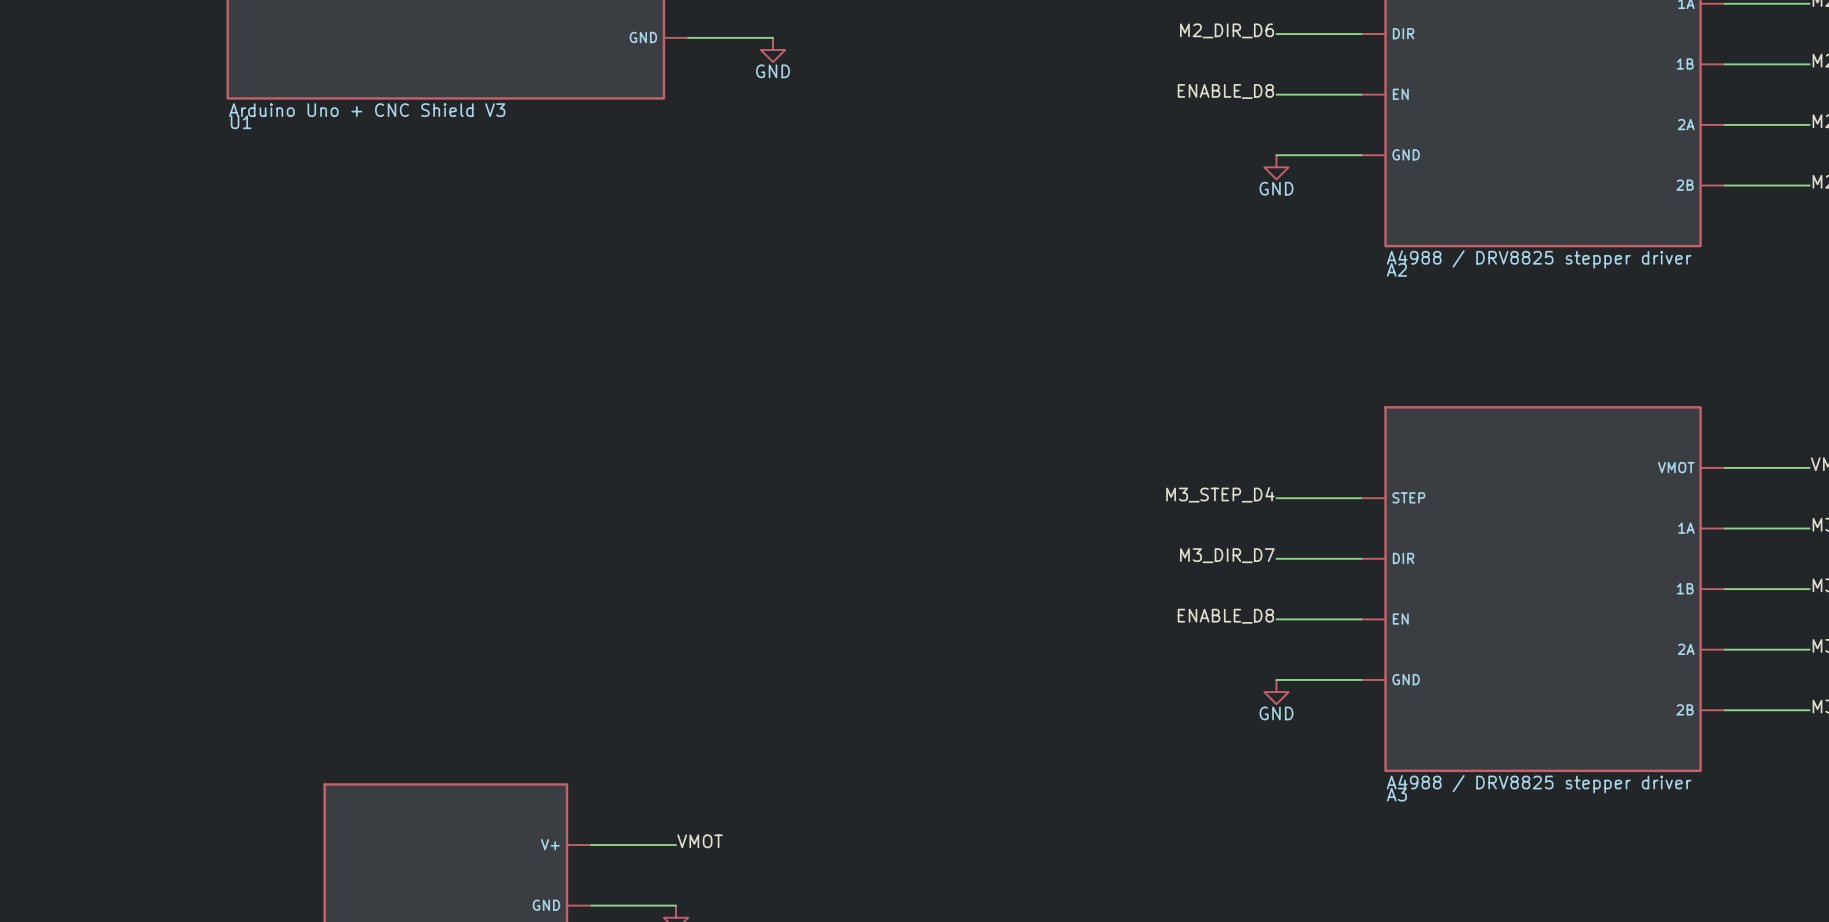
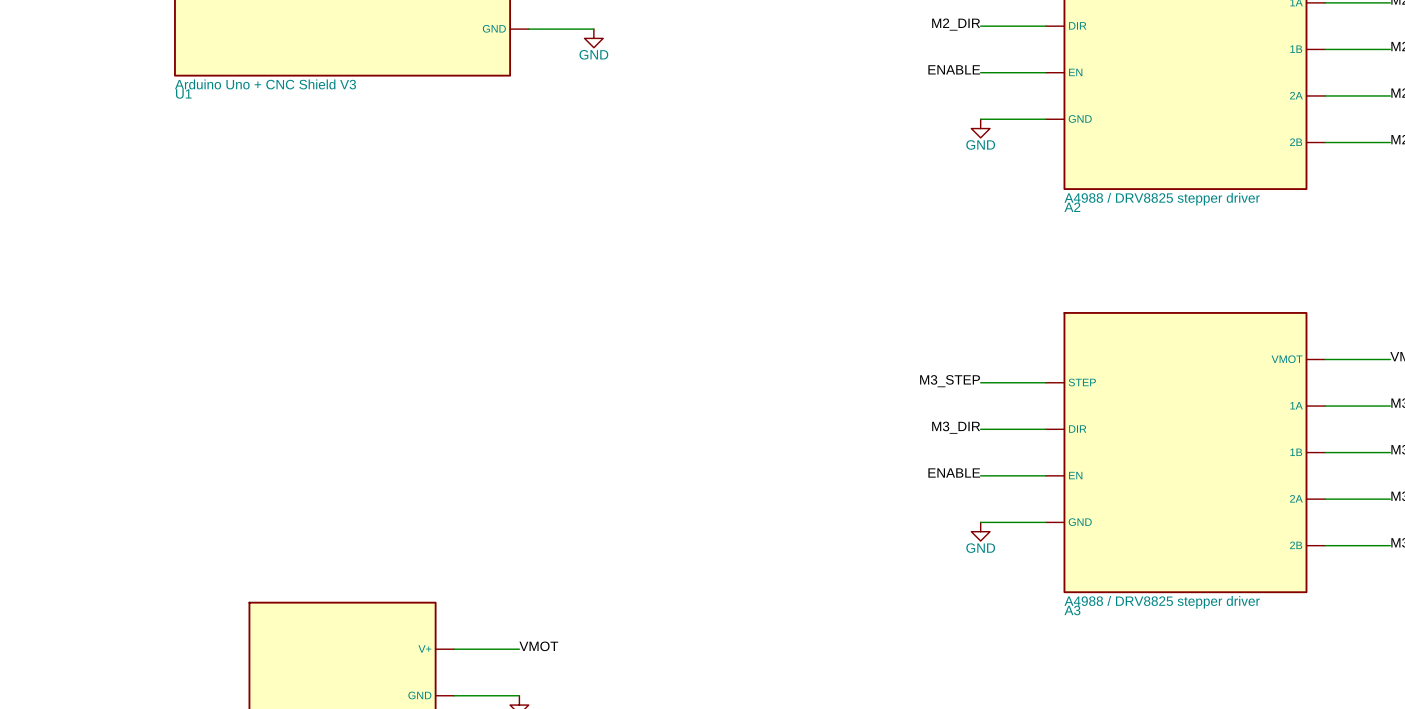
label: M2_DIR_D6 (1227, 30) -> M2_DIR (956, 24)
label: ENABLE_D8 (1225, 91) -> ENABLE (954, 69)
label: M3_STEP_D4 (1220, 494) -> M3_STEP (950, 381)
label: M3_DIR_D7 (1227, 555) -> M3_DIR (956, 427)
label: ENABLE_D8 (1225, 616) -> ENABLE (954, 472)

